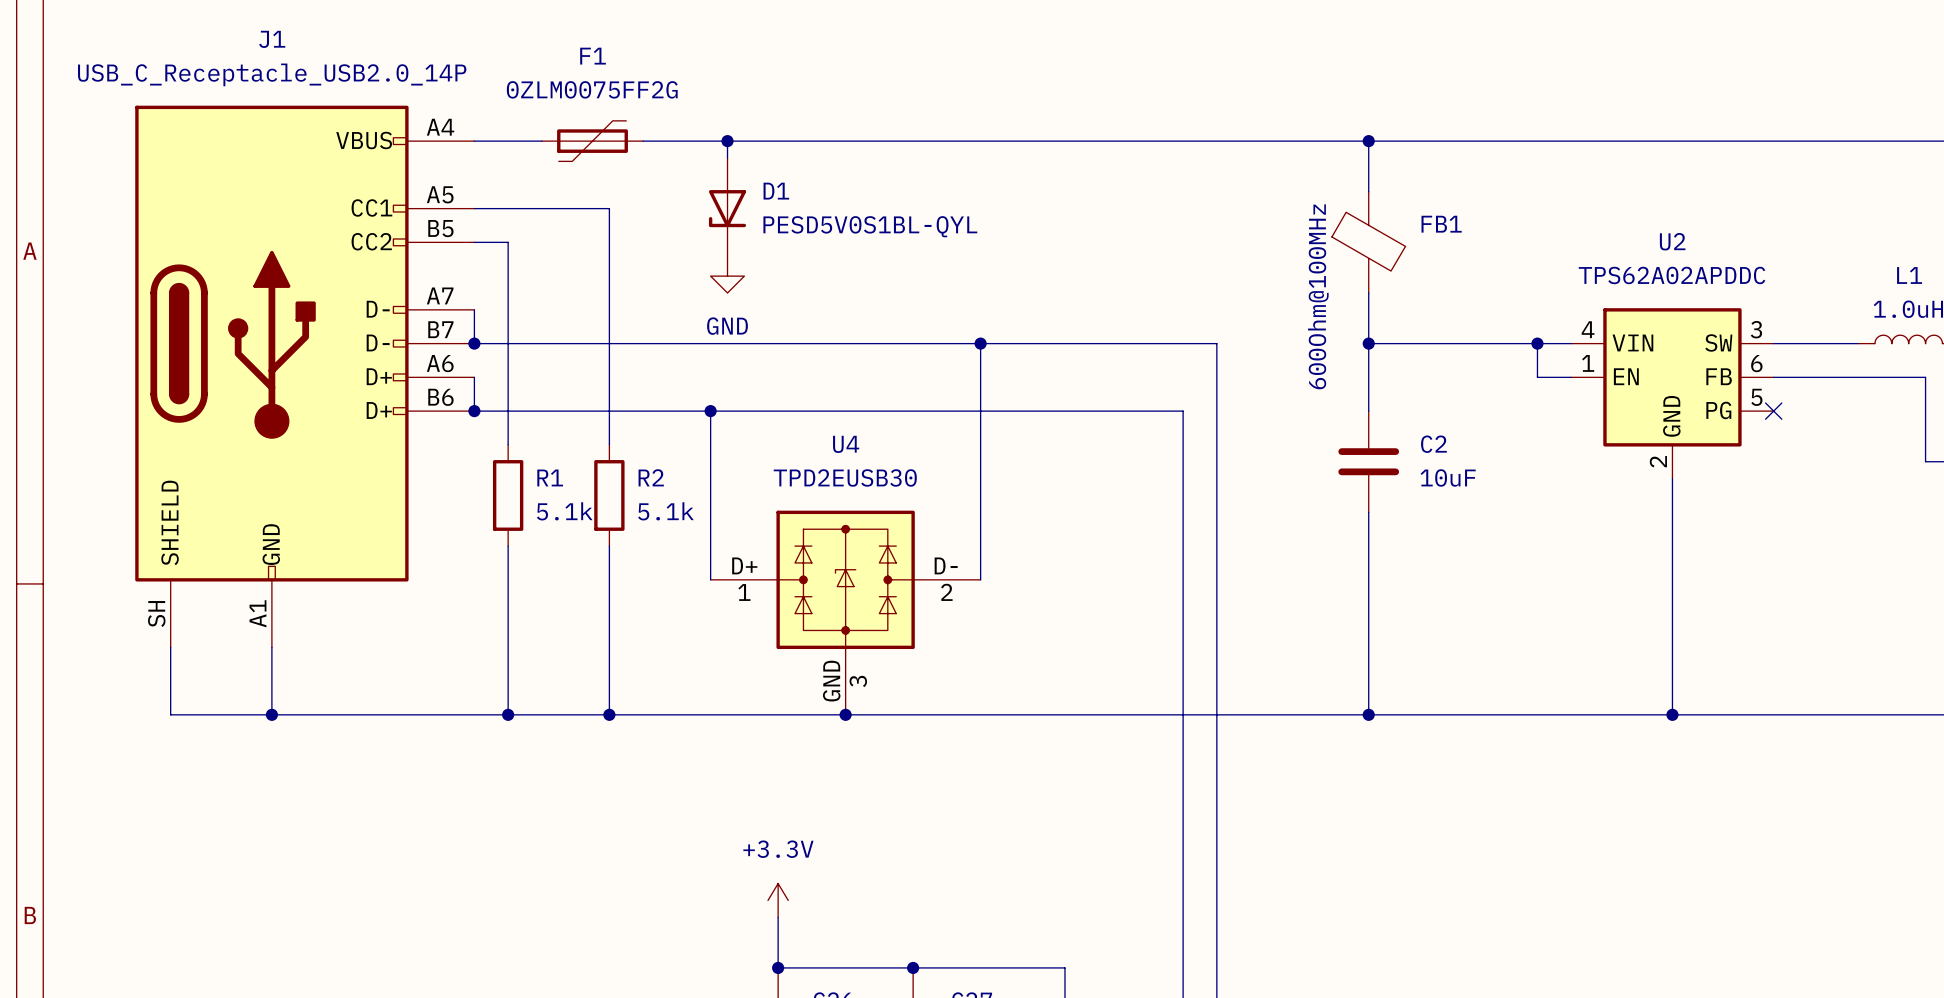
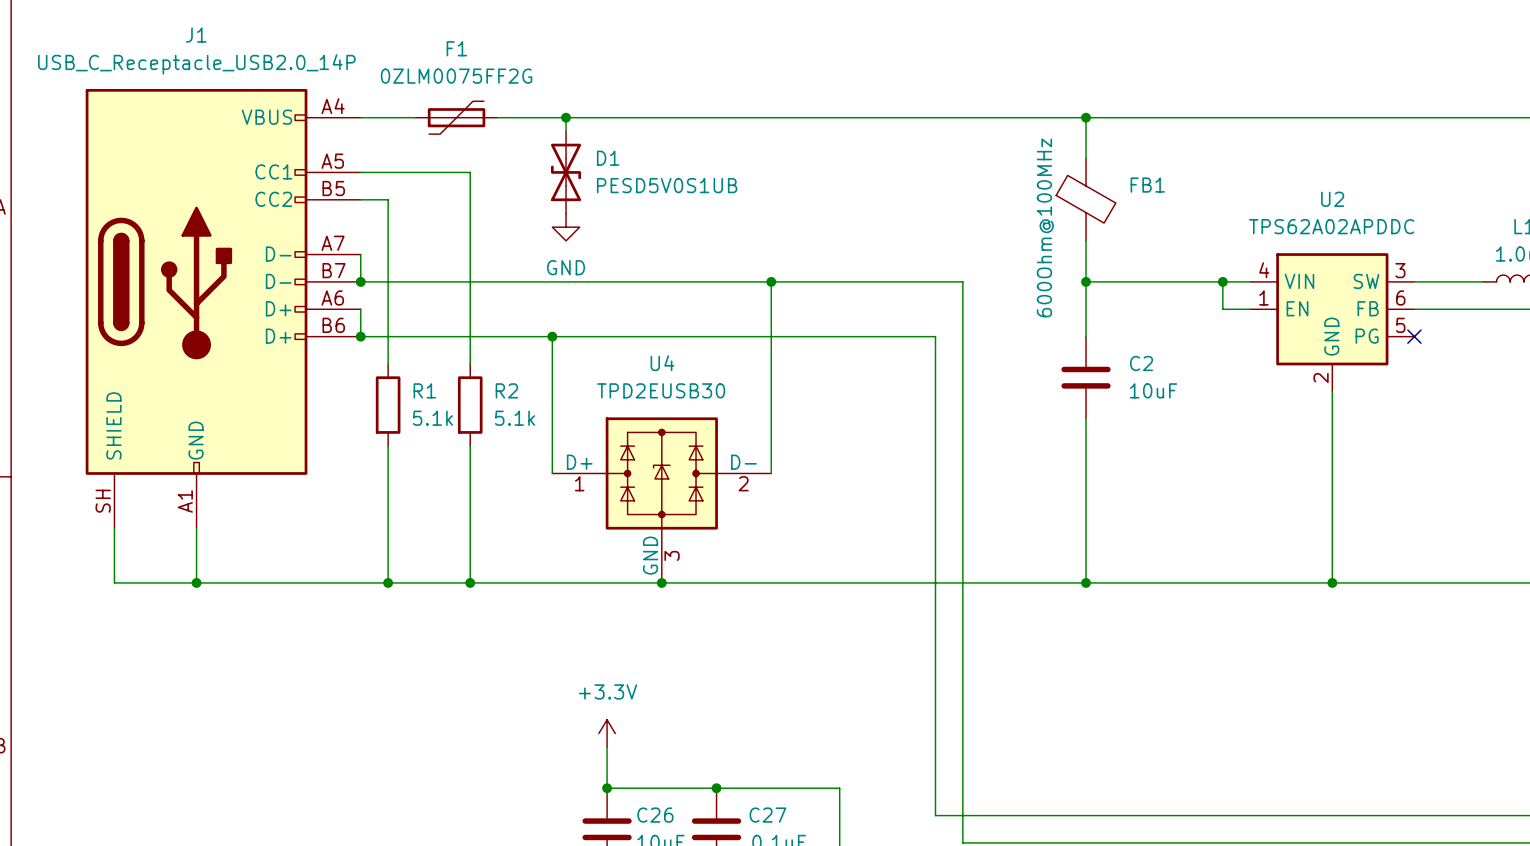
D1 symbol: [708, 157, 747, 260] -> [550, 131, 582, 214]
D1 value: PESD5V0S1BL-QYL (870, 226) -> PESD5V0S1UB (667, 185)

